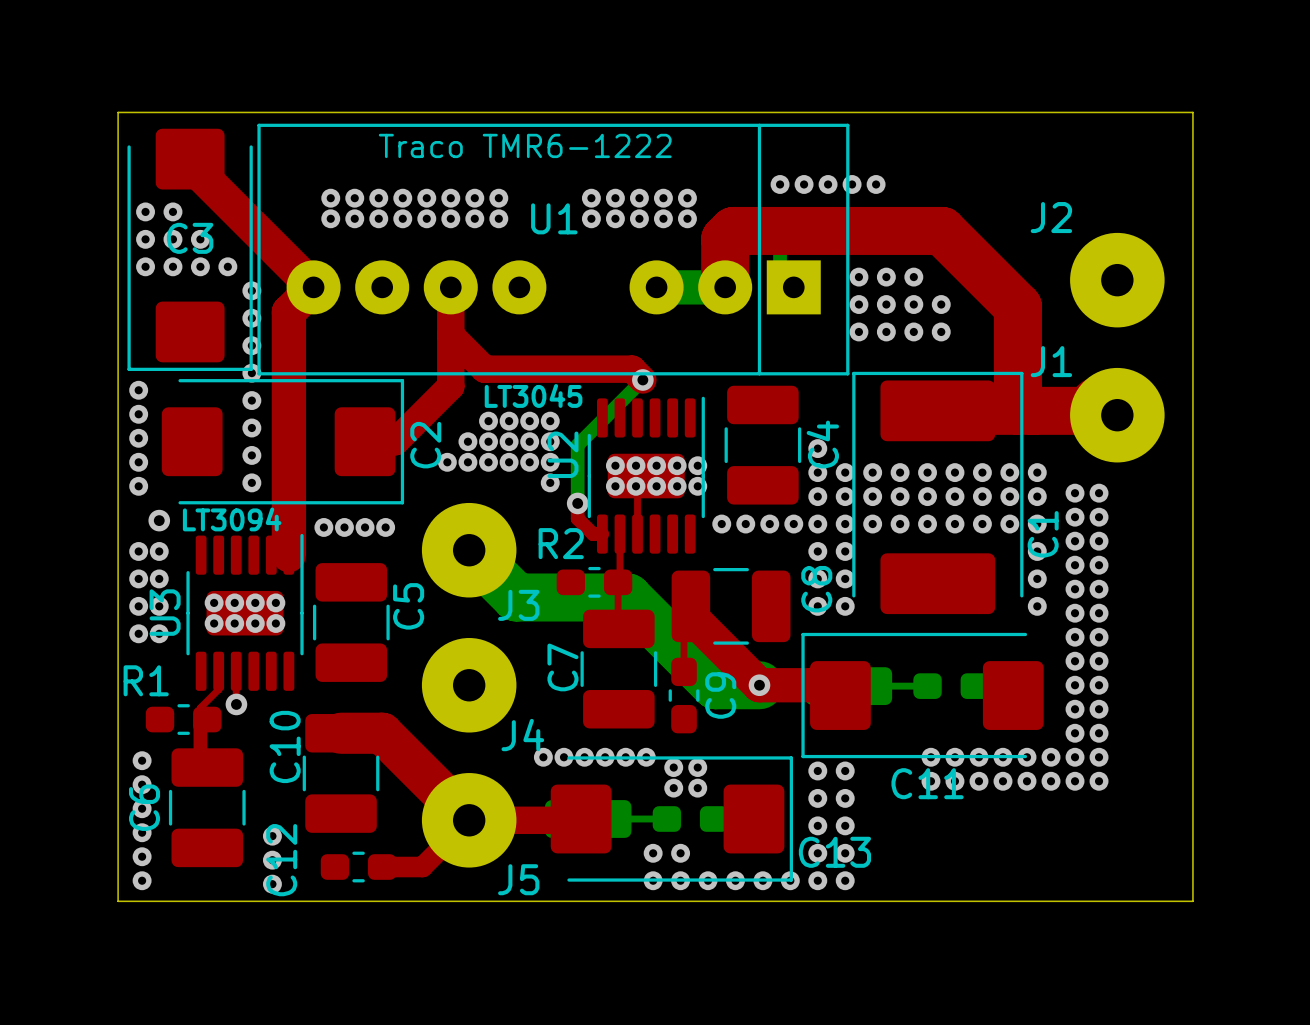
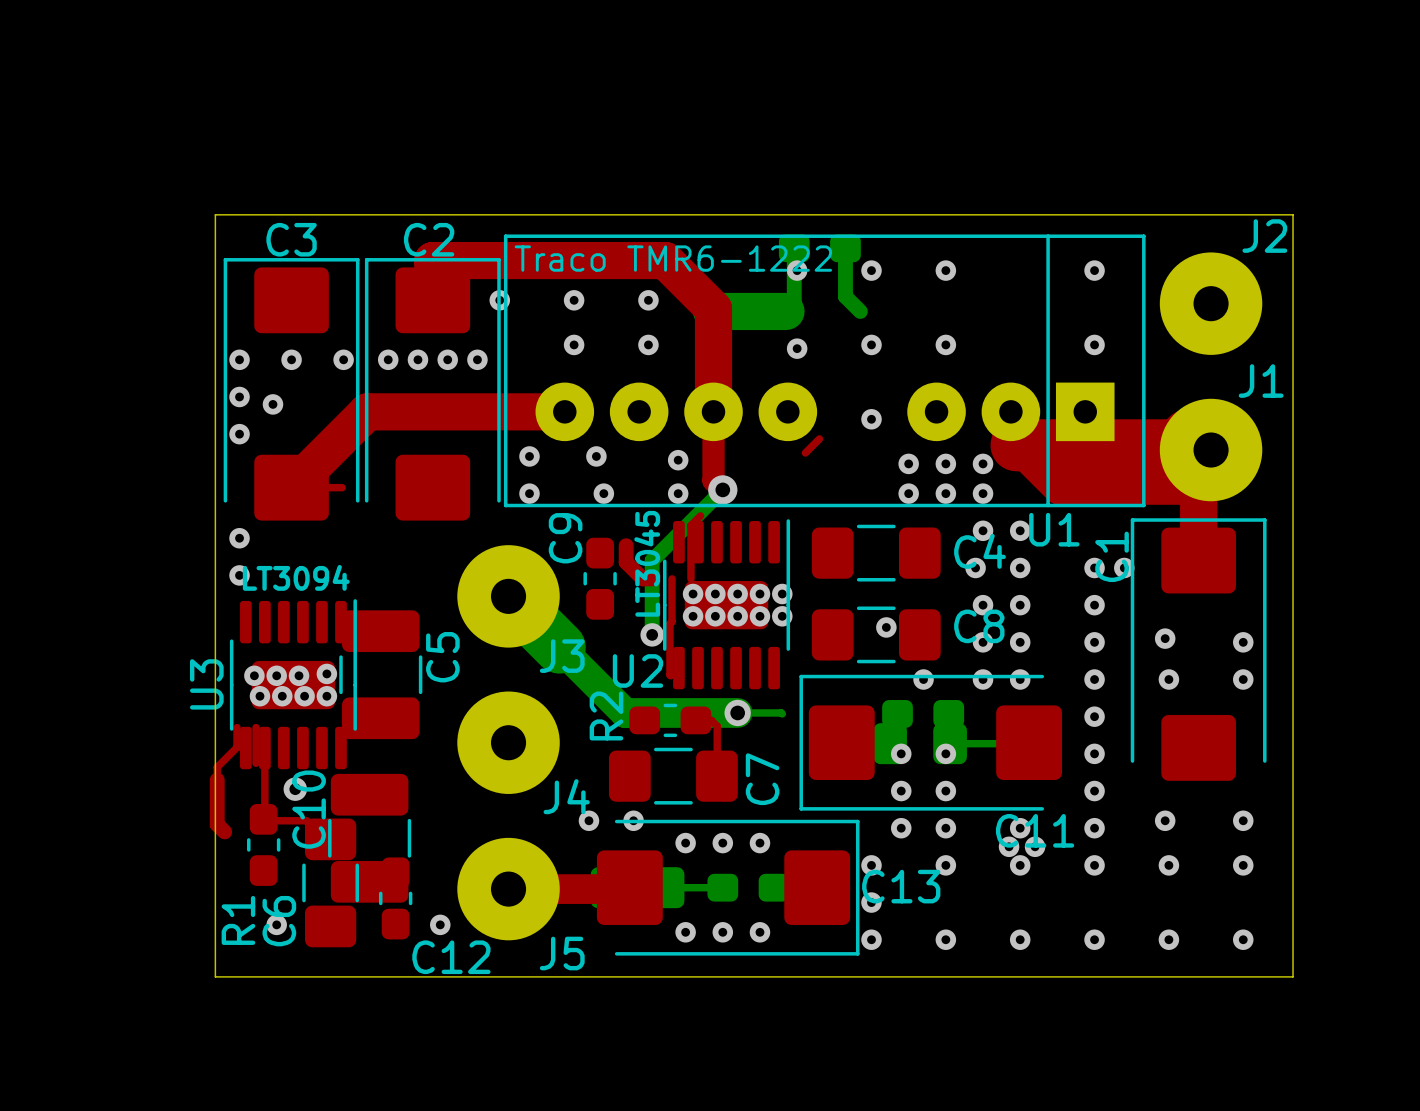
text position: Traco TMR6-1222 (525, 145) -> Traco TMR6-1222 (673, 258)
top track: (190, 159) (190, 163) (313, 287) (288, 312) (288, 555) -> none
via: (780, 184) -> none
via: (804, 184) -> none
via: (828, 184) -> none
via: (852, 184) -> none
via: (876, 184) -> none
via: (330, 198) -> none
via: (354, 198) -> none
via: (378, 198) -> none
via: (402, 198) -> none
via: (426, 198) -> none
via: (450, 198) -> none
via: (474, 198) -> none
via: (498, 198) -> none
via: (591, 198) -> none
via: (615, 198) -> none
via: (639, 198) -> none
via: (663, 198) -> none
via: (687, 198) -> none
board edge: (1192, 198) (1192, 112) (118, 112) (118, 901) (198, 901) -> (1293, 214) (215, 214) (215, 976)
via: (145, 211) -> none
via: (172, 211) -> none
J2 name position: J2 (1051, 217) -> J2 (1264, 236)
via: (330, 218) -> none
via: (354, 218) -> none
via: (378, 218) -> none
via: (402, 218) -> none
via: (426, 218) -> none
via: (450, 218) -> none
via: (474, 218) -> none
via: (498, 218) -> none
U1 name position: U1 (554, 218) -> U1 (1054, 529)
via: (591, 218) -> none
via: (615, 218) -> none
via: (639, 218) -> none
via: (663, 218) -> none
via: (687, 218) -> none
C3 name position: C3 (190, 238) -> C3 (291, 239)
via: (145, 239) -> none
via: (172, 239) -> none
via: (200, 239) -> none
C3 rotation: 0° (190, 249) -> 180° (291, 389)
U1 position: (553, 249) -> (824, 370)
via: none -> (797, 270)
via: none -> (871, 270)
via: none -> (945, 270)
via: none -> (1094, 270)
via: (145, 266) -> none
via: (172, 266) -> none
via: (200, 266) -> none
via: (227, 266) -> none
top track: none -> (432, 300) (432, 260) (665, 260) (713, 308) (713, 480) (722, 489)
via: none -> (499, 300)
via: none -> (574, 300)
via: none -> (648, 300)
via: (858, 277) -> none
via: (886, 277) -> none
via: (913, 277) -> none
top track: (450, 287) (450, 386) (395, 441) (365, 441) -> none
top track: (725, 287) (725, 239) (733, 230) (941, 230) (1017, 306) (1017, 410) -> none
via: (251, 290) -> none
via: (858, 304) -> none
via: (886, 304) -> none
via: (913, 304) -> none
via: (941, 304) -> none
via: (251, 318) -> none
via: none -> (574, 344)
via: none -> (648, 344)
via: none -> (871, 344)
via: none -> (945, 344)
via: none -> (1094, 344)
via: none -> (797, 348)
via: none -> (239, 359)
via: none -> (291, 359)
via: none -> (343, 359)
via: none -> (388, 359)
via: none -> (417, 359)
via: none -> (447, 359)
via: none -> (477, 359)
via: (858, 331) -> none
via: (886, 331) -> none
via: (913, 331) -> none
via: (941, 331) -> none
top track: (450, 335) (484, 369) (632, 369) (642, 379) -> none
via: (251, 345) -> none
J1 name position: J1 (1051, 361) -> J1 (1261, 381)
via: none -> (239, 396)
C1 footprint: [852, 371, 1024, 615] -> [1130, 518, 1267, 781]
top track: none -> (564, 411) (367, 411) (291, 487) (342, 487)
bottom track: (642, 379) (577, 445) (577, 503) -> none
via: (642, 379) -> none
C4 footprint: [724, 385, 802, 505] -> [811, 524, 941, 582]
via: none -> (871, 419)
via: (138, 390) -> none
text rotation: 0° (533, 395) -> 90° counterclockwise (647, 563)
text position: LT3045 (533, 395) -> LT3045 (647, 563)
via: none -> (239, 434)
via: (251, 400) -> none
top track: none -> (1010, 436) (1060, 486) (1183, 486) (1211, 458) (1211, 450) (1198, 462) (1198, 560)
via: (138, 414) -> none
via: (509, 421) -> none
via: (529, 421) -> none
via: none -> (678, 460)
via: (251, 428) -> none
via: none -> (908, 463)
via: none -> (945, 463)
via: none -> (983, 463)
via: (138, 438) -> none
C2 rotation: 0° (282, 441) -> 90° counterclockwise (432, 389)
via: (467, 441) -> none
via: (488, 441) -> none
via: (509, 441) -> none
via: (529, 441) -> none
via: (550, 441) -> none
via: (817, 448) -> none
bottom track: none -> (722, 489) (652, 560) (652, 634)
via: none -> (722, 489)
U2 name rotation: 0° (562, 454) -> 90° clockwise (637, 670)
U2 name position: U2 (562, 454) -> U2 (637, 670)
via: (251, 455) -> none
via: none -> (529, 493)
via: none -> (603, 493)
via: none -> (678, 493)
via: none -> (983, 493)
via: (138, 462) -> none
via: (447, 462) -> none
via: (467, 462) -> none
via: (488, 462) -> none
via: (509, 462) -> none
via: (529, 462) -> none
via: (550, 462) -> none
via: (615, 465) -> none
via: (636, 465) -> none
via: (656, 465) -> none
via: (677, 465) -> none
via: (697, 465) -> none
via: (817, 472) -> none
via position: (845, 472) -> (908, 493)
via position: (872, 472) -> (945, 493)
via: (900, 472) -> none
via: (927, 472) -> none
via: (954, 472) -> none
via: (982, 472) -> none
via: (1009, 472) -> none
via: (1037, 472) -> none
U2 position: (646, 475) -> (726, 604)
via: (251, 482) -> none
via: (550, 482) -> none
via: (138, 486) -> none
via: (615, 486) -> none
via: (636, 486) -> none
via: (656, 486) -> none
via: (677, 486) -> none
via: (697, 486) -> none
via: none -> (983, 530)
via: none -> (1020, 530)
via: (1075, 493) -> none
via: (1099, 493) -> none
via: none -> (239, 538)
via: (817, 496) -> none
via: (845, 496) -> none
via: (872, 496) -> none
via: (900, 496) -> none
via: (927, 496) -> none
via: (954, 496) -> none
via: (982, 496) -> none
via: (1009, 496) -> none
via: (1037, 496) -> none
via position: (577, 503) -> (652, 634)
via: (1075, 517) -> none
via: (1099, 517) -> none
text position: LT3094 (232, 519) -> LT3094 (296, 577)
via: (159, 520) -> none
via: (721, 524) -> none
via: (745, 524) -> none
via: (769, 524) -> none
via: (793, 524) -> none
via: (817, 524) -> none
via: (845, 524) -> none
via: (872, 524) -> none
via: (927, 524) -> none
via: none -> (1020, 567)
via: (954, 524) -> none
via: (982, 524) -> none
via: (323, 527) -> none
via: (344, 527) -> none
via: (365, 527) -> none
via: (385, 527) -> none
via: none -> (239, 575)
C1 name position: C1 (1043, 534) -> C1 (1112, 556)
via: (1075, 541) -> none
via: (1099, 541) -> none
R2 name rotation: 0° (561, 543) -> 90° counterclockwise (606, 715)
via: none -> (693, 594)
via: none -> (715, 594)
via: none -> (737, 594)
via: none -> (759, 594)
via: none -> (782, 594)
via: (138, 551) -> none
via: (159, 551) -> none
via: (817, 551) -> none
via: (845, 551) -> none
via: (1037, 551) -> none
via: none -> (983, 605)
via: none -> (1020, 605)
via: none -> (1094, 605)
via: (1075, 565) -> none
via: (1099, 565) -> none
via: none -> (693, 616)
via: none -> (715, 616)
C8 footprint: [671, 568, 791, 645] -> [811, 606, 941, 664]
via: none -> (737, 616)
via: none -> (759, 616)
via: none -> (782, 616)
via: (138, 578) -> none
via: (159, 578) -> none
via: (845, 578) -> none
via: (1037, 578) -> none
R2 position: (594, 582) -> (670, 720)
via: (1099, 589) -> none
via: none -> (983, 642)
via: none -> (1020, 642)
via: none -> (1094, 642)
via: none -> (1243, 642)
bottom track: (516, 597) (627, 597) (715, 685) (821, 686) -> (559, 647) (625, 712) (782, 713)
via: (214, 602) -> none
via: (234, 602) -> none
via: (255, 602) -> none
via: (275, 602) -> none
via: (138, 606) -> none
via: (159, 606) -> none
via: (817, 606) -> none
via: (845, 606) -> none
via: (1037, 606) -> none
C7 footprint: [580, 609, 658, 729] -> [609, 747, 738, 805]
U3 position: (245, 612) -> (293, 684)
via: (1075, 613) -> none
via: (1099, 613) -> none
via: none -> (326, 673)
via: (214, 623) -> none
via: none -> (923, 679)
via: none -> (983, 679)
via: none -> (1020, 679)
via: none -> (1094, 679)
via: none -> (1168, 679)
via: none -> (1243, 679)
via: (138, 633) -> none
via: (159, 633) -> none
via: (1075, 637) -> none
via: (1099, 637) -> none
via: none -> (259, 696)
via: none -> (282, 696)
via: none -> (304, 696)
via: none -> (326, 696)
via: none -> (737, 712)
via: none -> (1094, 716)
via: (1075, 661) -> none
via: (1099, 661) -> none
top track: none -> (695, 720) (711, 720) (717, 726) (717, 774)
C7 name position: C7 (562, 667) -> C7 (762, 779)
top track: (684, 671) (684, 613) (690, 606) (690, 616) (759, 685) (830, 685) (840, 695) -> none
R1 name position: R1 (146, 680) -> R1 (238, 920)
via: (759, 685) -> none
via: (1075, 685) -> none
via: (1099, 685) -> none
part position: (951, 686) -> (923, 713)
top track: none -> (264, 748) (263, 819) (306, 820) (325, 839) (330, 839)
C9 position: (684, 695) -> (600, 578)
C9 name position: C9 (720, 695) -> C9 (565, 538)
via: none -> (901, 753)
via: none -> (945, 753)
C11 position: (922, 695) -> (930, 742)
via: none -> (1094, 753)
via position: (236, 704) -> (295, 789)
via: (1075, 709) -> none
via: (1099, 709) -> none
R1 rotation: 0° (183, 719) -> 90° clockwise (263, 844)
R1 position: (183, 719) -> (263, 844)
via: none -> (901, 791)
via: none -> (945, 791)
via: none -> (1094, 791)
top track: (341, 733) (382, 733) (469, 820) (422, 867) (382, 867) -> none
via: (1075, 733) -> none
via: (1099, 733) -> none
C6 footprint: [168, 748, 246, 868] -> [302, 818, 360, 948]
via: (563, 757) -> none
via: (605, 757) -> none
via: (625, 757) -> none
via: (646, 757) -> none
via: (930, 757) -> none
via: (954, 757) -> none
via: (978, 757) -> none
via: (1002, 757) -> none
via: (1027, 757) -> none
via: (1051, 757) -> none
via: (1099, 757) -> none
via: none -> (1243, 820)
via: (142, 760) -> none
via: none -> (901, 828)
via: none -> (945, 828)
via: none -> (1020, 828)
via: none -> (1094, 828)
via: (673, 767) -> none
via: (697, 767) -> none
via: (817, 770) -> none
via: (845, 770) -> none
via: none -> (685, 843)
via: none -> (722, 843)
via: none -> (759, 843)
via: (978, 781) -> none
via: (1002, 781) -> none
via: (1027, 781) -> none
via: (1051, 781) -> none
via position: (1075, 781) -> (1168, 865)
via: (1099, 781) -> none
C11 name position: C11 (927, 783) -> C11 (1035, 830)
via: (142, 784) -> none
via: (673, 788) -> none
via: (697, 788) -> none
via position: (817, 798) -> (871, 865)
via: (845, 798) -> none
via: none -> (945, 865)
via: none -> (1020, 865)
via: none -> (1094, 865)
via: none -> (1243, 865)
via: (142, 808) -> none
via position: (817, 825) -> (871, 902)
via: (845, 825) -> none
via: (142, 832) -> none
via: (272, 836) -> none
C13 name position: C13 (834, 852) -> C13 (901, 886)
via: none -> (276, 924)
via: none -> (440, 924)
via: (653, 853) -> none
via: (680, 853) -> none
via: (817, 853) -> none
via: (845, 853) -> none
via: (142, 856) -> none
via: (272, 860) -> none
C12 name position: C12 (281, 860) -> C12 (451, 957)
via: none -> (685, 932)
via: none -> (722, 932)
via: none -> (759, 932)
C12 rotation: 0° (358, 867) -> 90° clockwise (395, 898)
via: none -> (871, 939)
via: none -> (945, 939)
via: none -> (1020, 939)
via: none -> (1094, 939)
via: none -> (1168, 939)
via: none -> (1243, 939)
via: (142, 880) -> none
via: (653, 880) -> none
via: (680, 880) -> none
via: (708, 880) -> none
via: (735, 880) -> none
via: (762, 880) -> none
via: (790, 880) -> none
via: (817, 880) -> none
via: (845, 880) -> none
via: (272, 884) -> none

